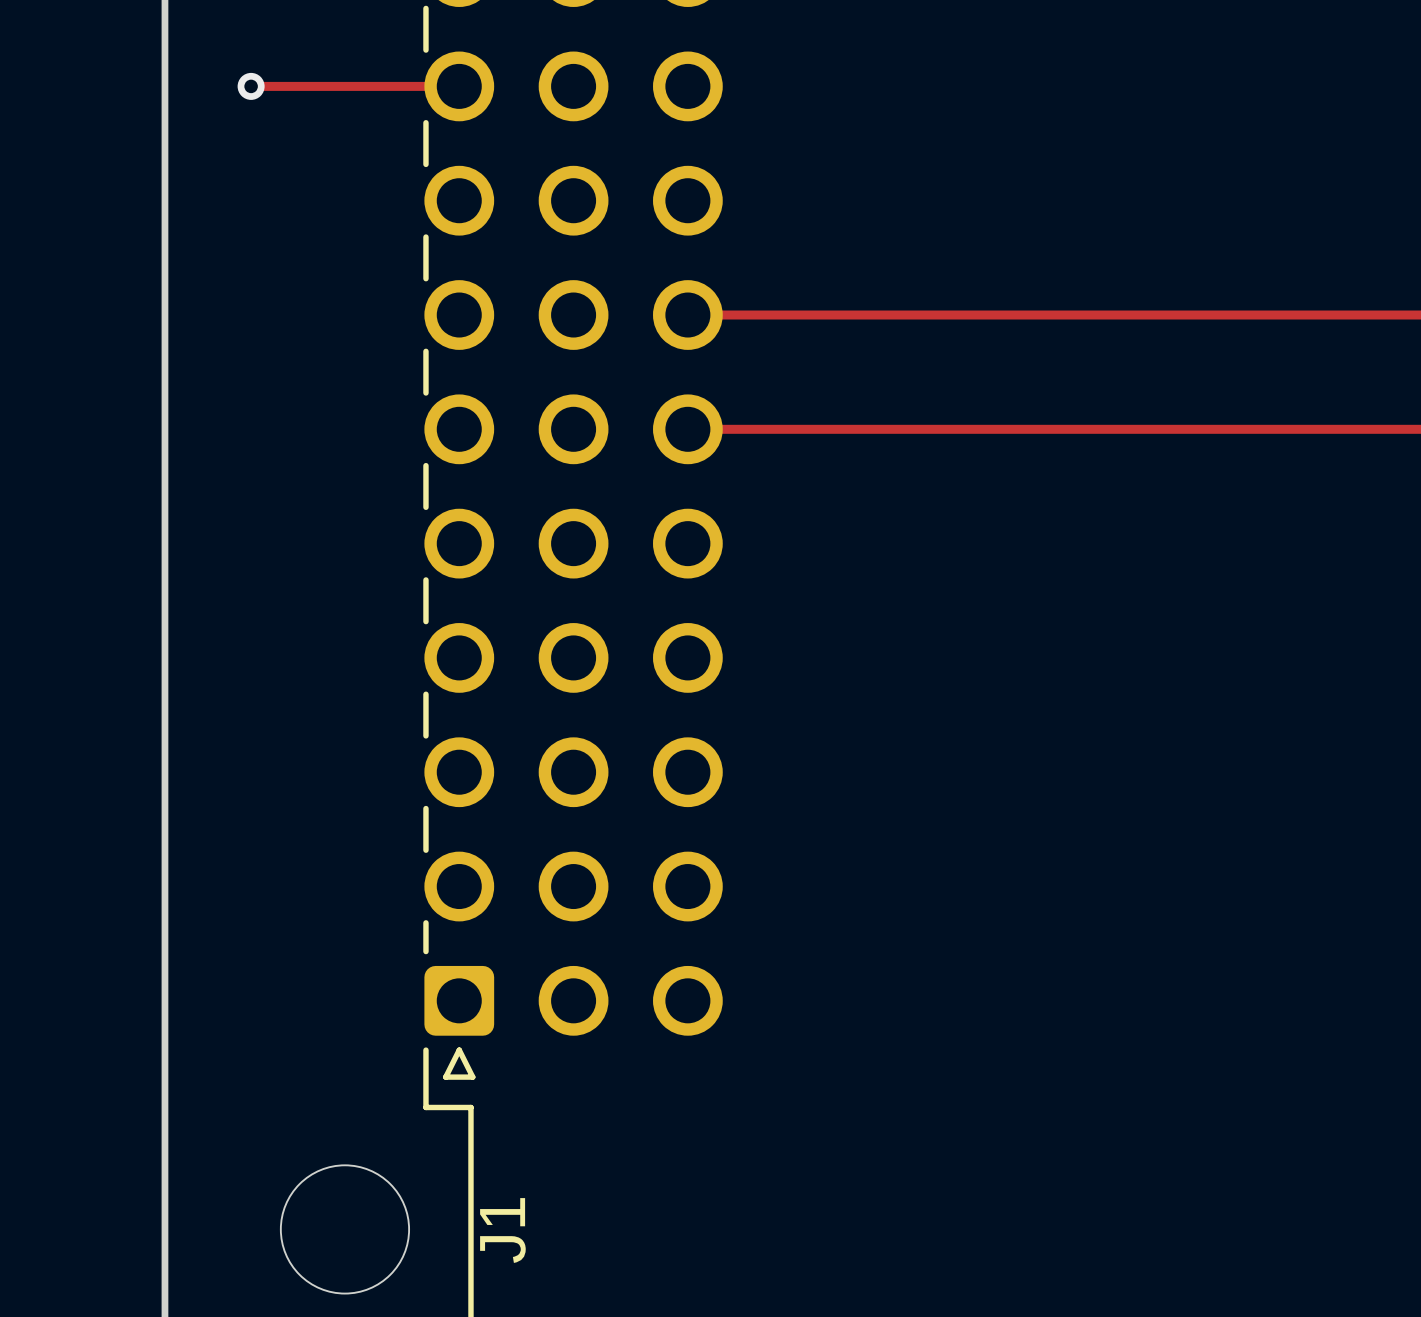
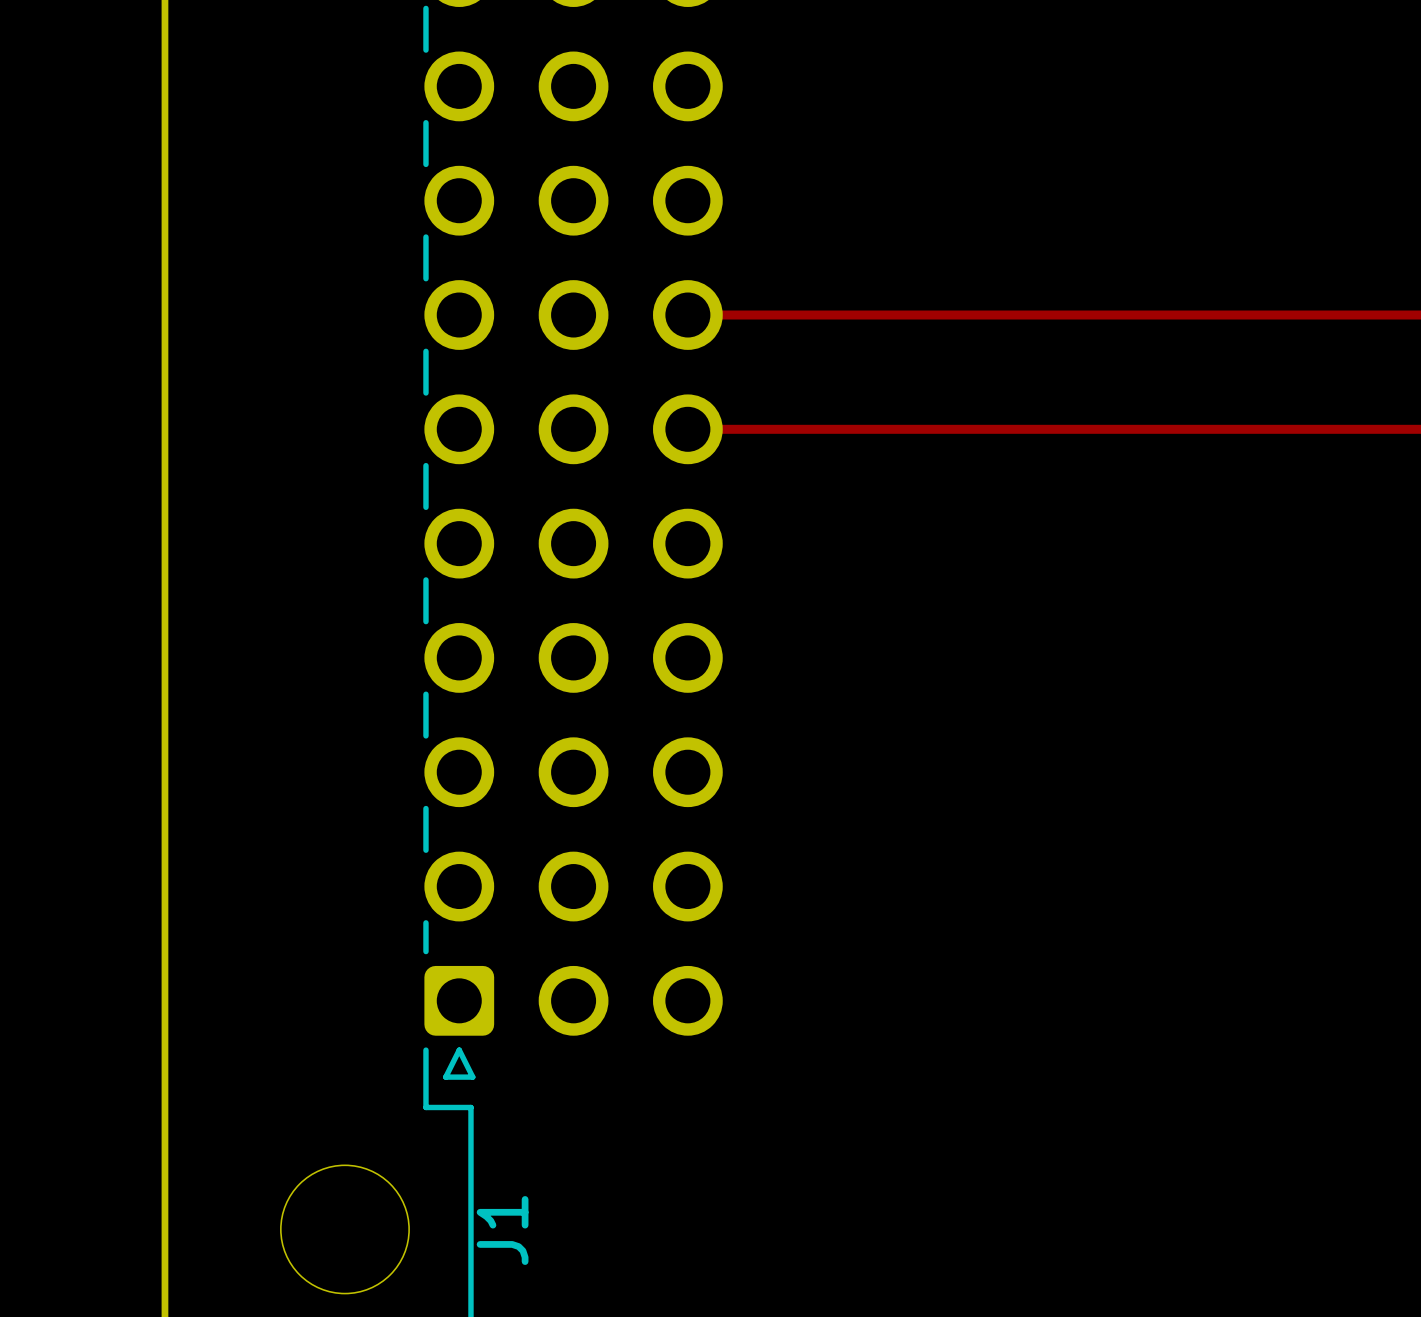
track: (251, 86) (459, 86) -> none
via: (251, 86) -> none

